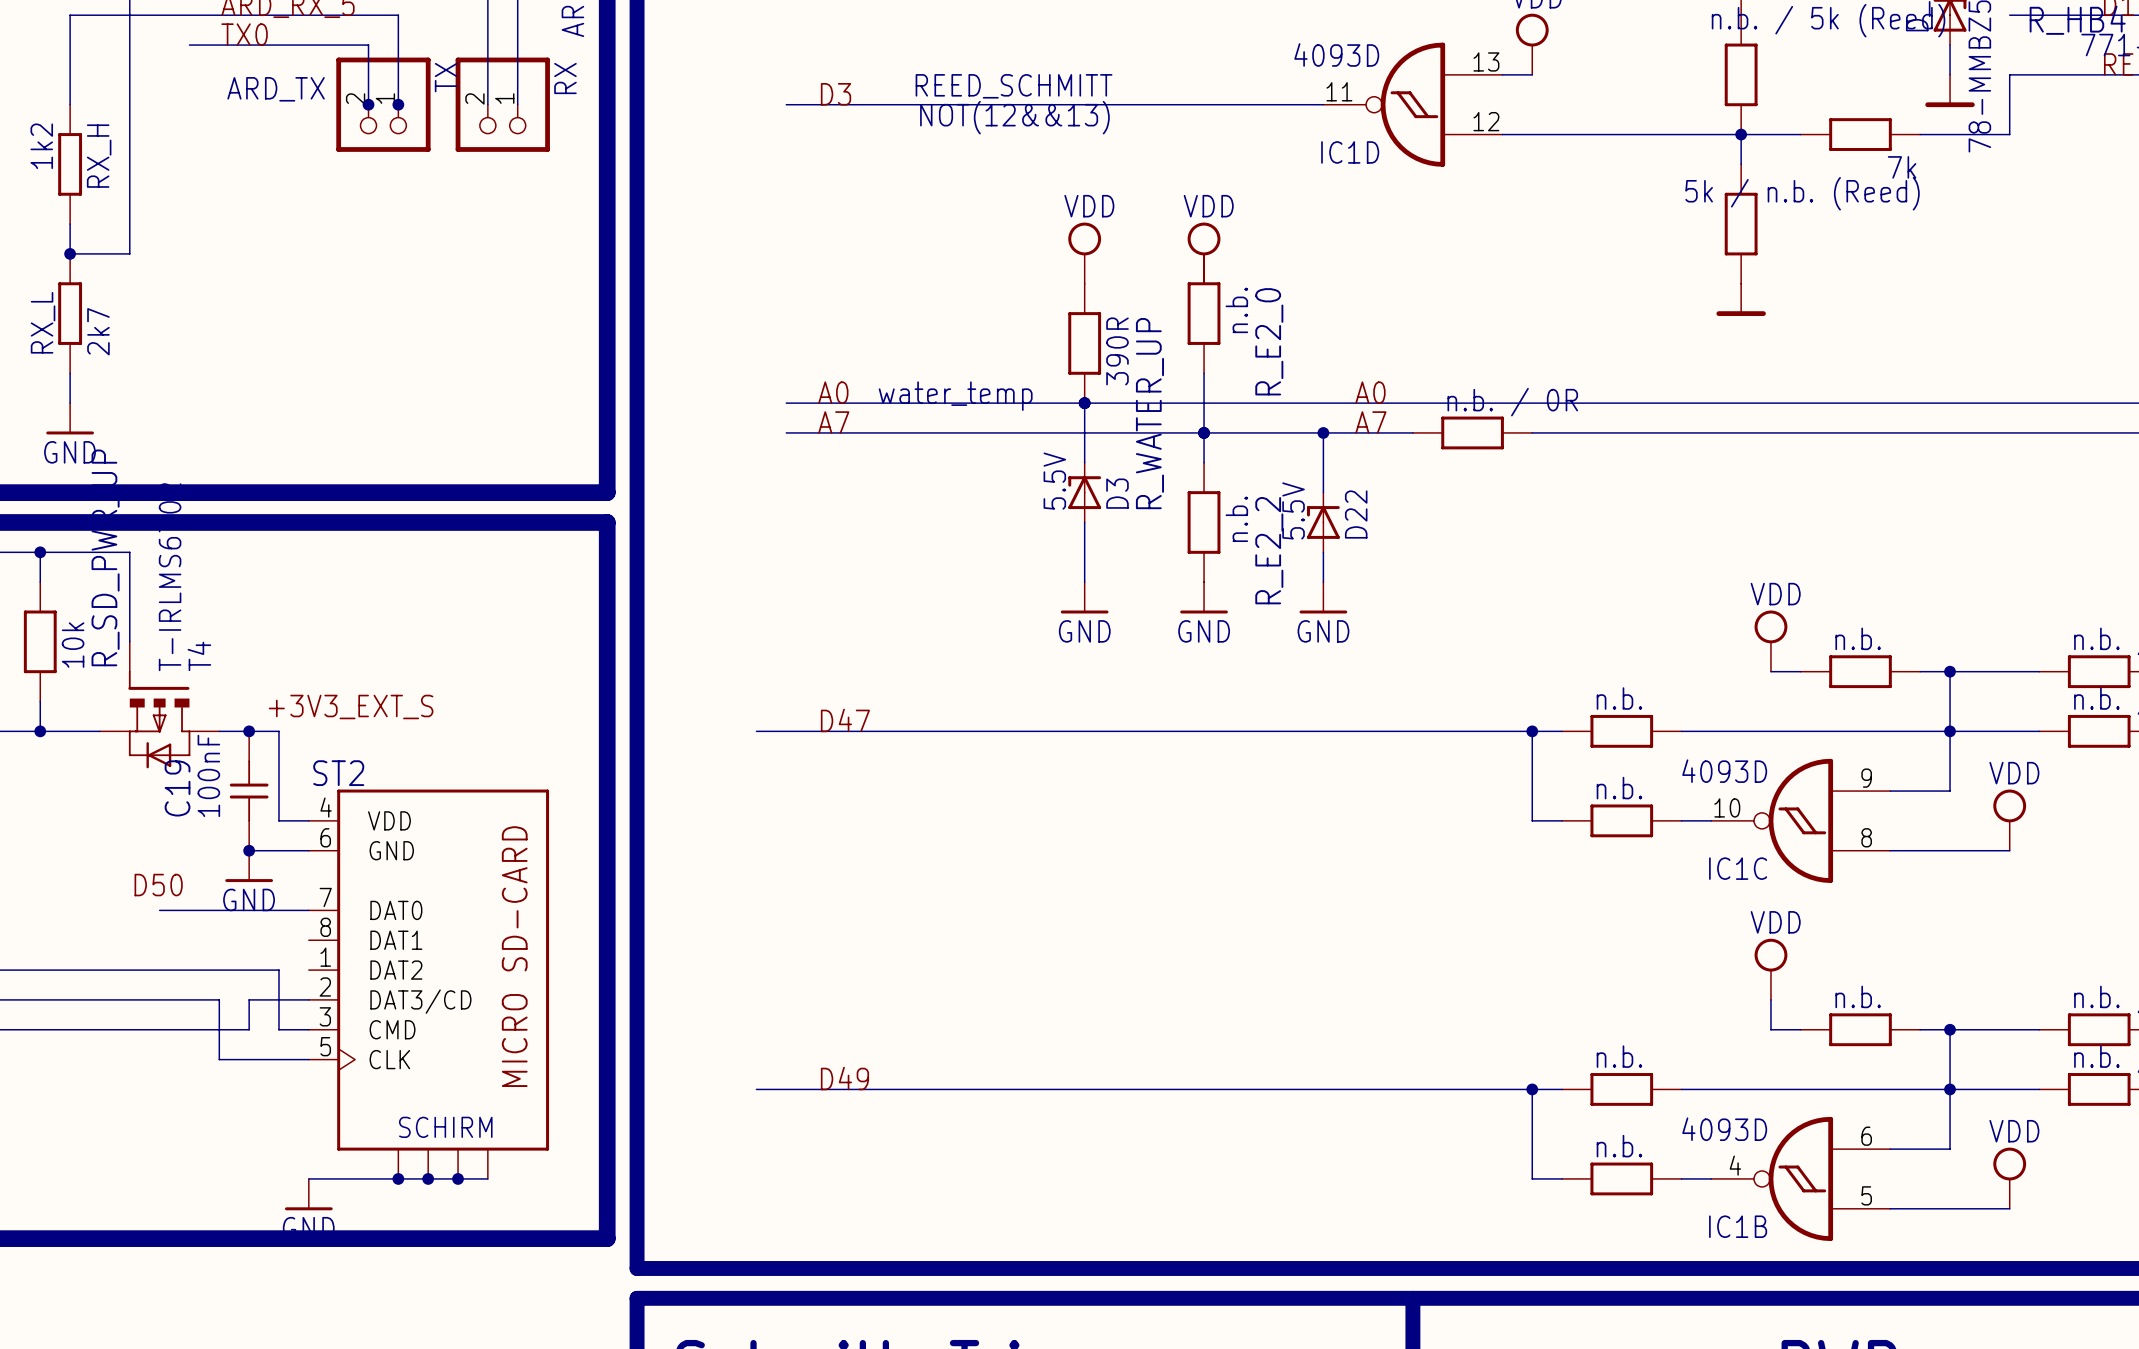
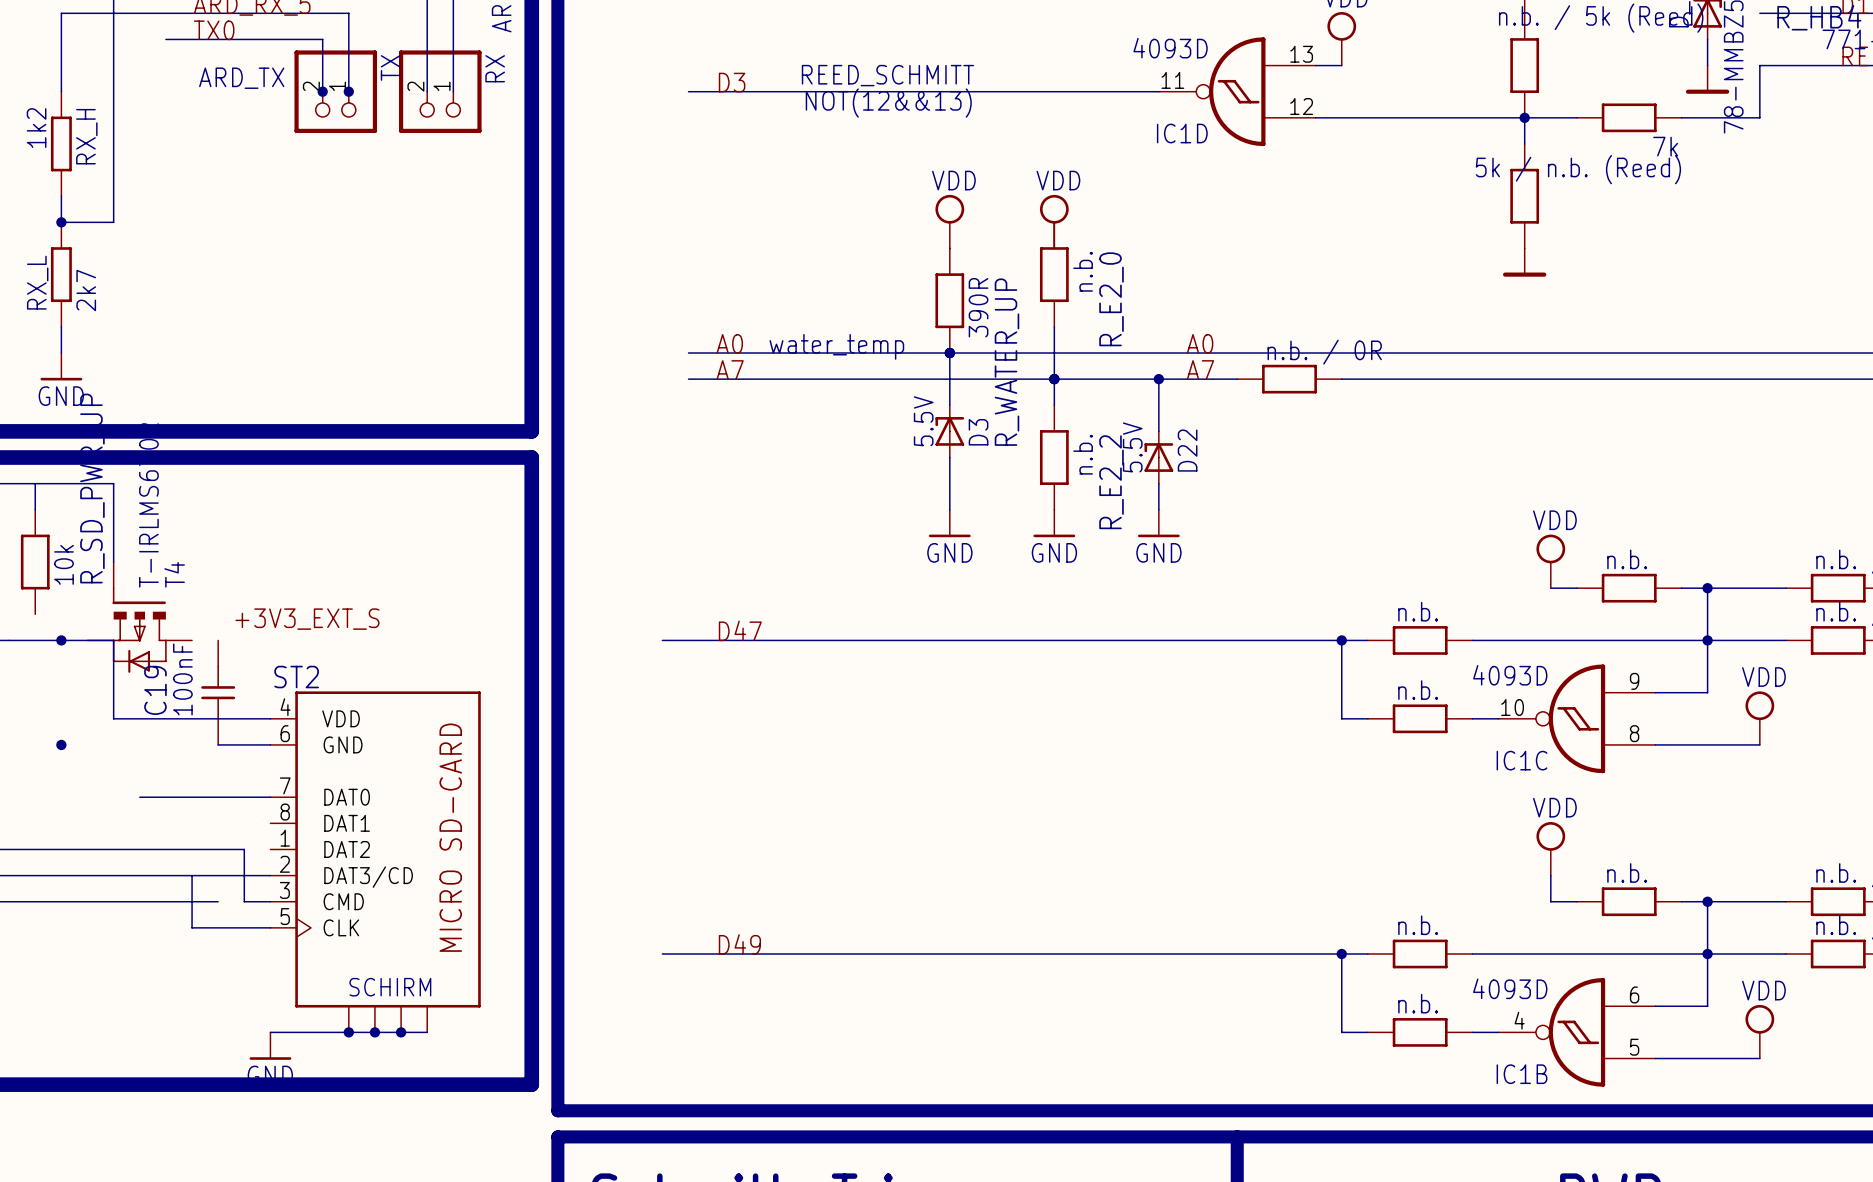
junction: (40, 552) -> none
wire: (40, 701) (40, 731) -> none
junction position: (40, 731) -> (61, 640)
wire: (219, 731) (278, 731) (278, 820) -> (87, 640) (113, 640) (113, 718) (244, 718)
junction: (249, 731) -> none
junction: none -> (61, 744)
junction: (249, 850) -> none
power symbol: GND (249, 866) -> none
label: D50 (158, 885) -> none
wire: (249, 999) (249, 1029) -> (218, 875) (192, 875)

